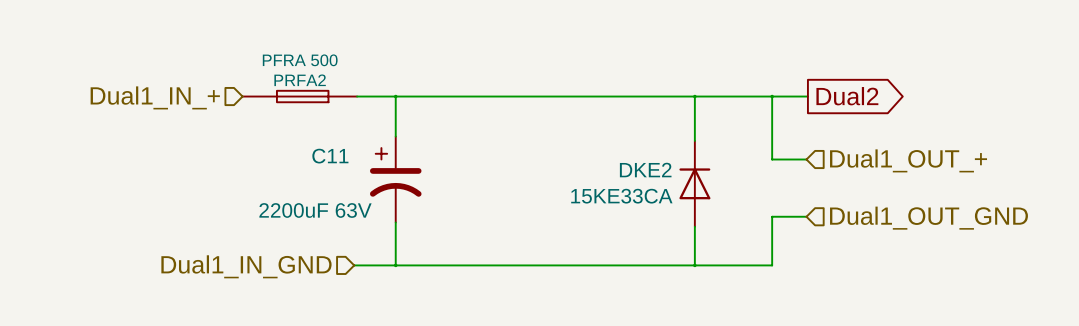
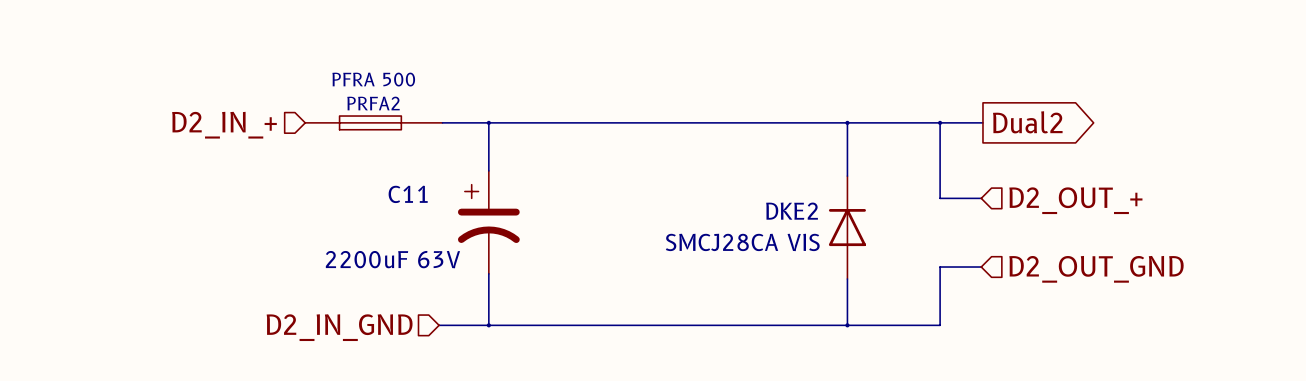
PRFA2 flip: as is (302, 96) -> left-right (370, 122)
hierarchical label: Dual1_IN_+ (155, 97) -> D2_IN_+ (224, 125)
hierarchical label: Dual1_OUT_+ (908, 160) -> D2_OUT_+ (1075, 200)
DKE2 value: 15KE33CA (621, 196) -> SMCJ28CA VIS (742, 242)
hierarchical label: Dual1_OUT_GND (928, 218) -> D2_OUT_GND (1096, 269)
hierarchical label: Dual1_IN_GND (246, 266) -> D2_IN_GND (339, 327)

